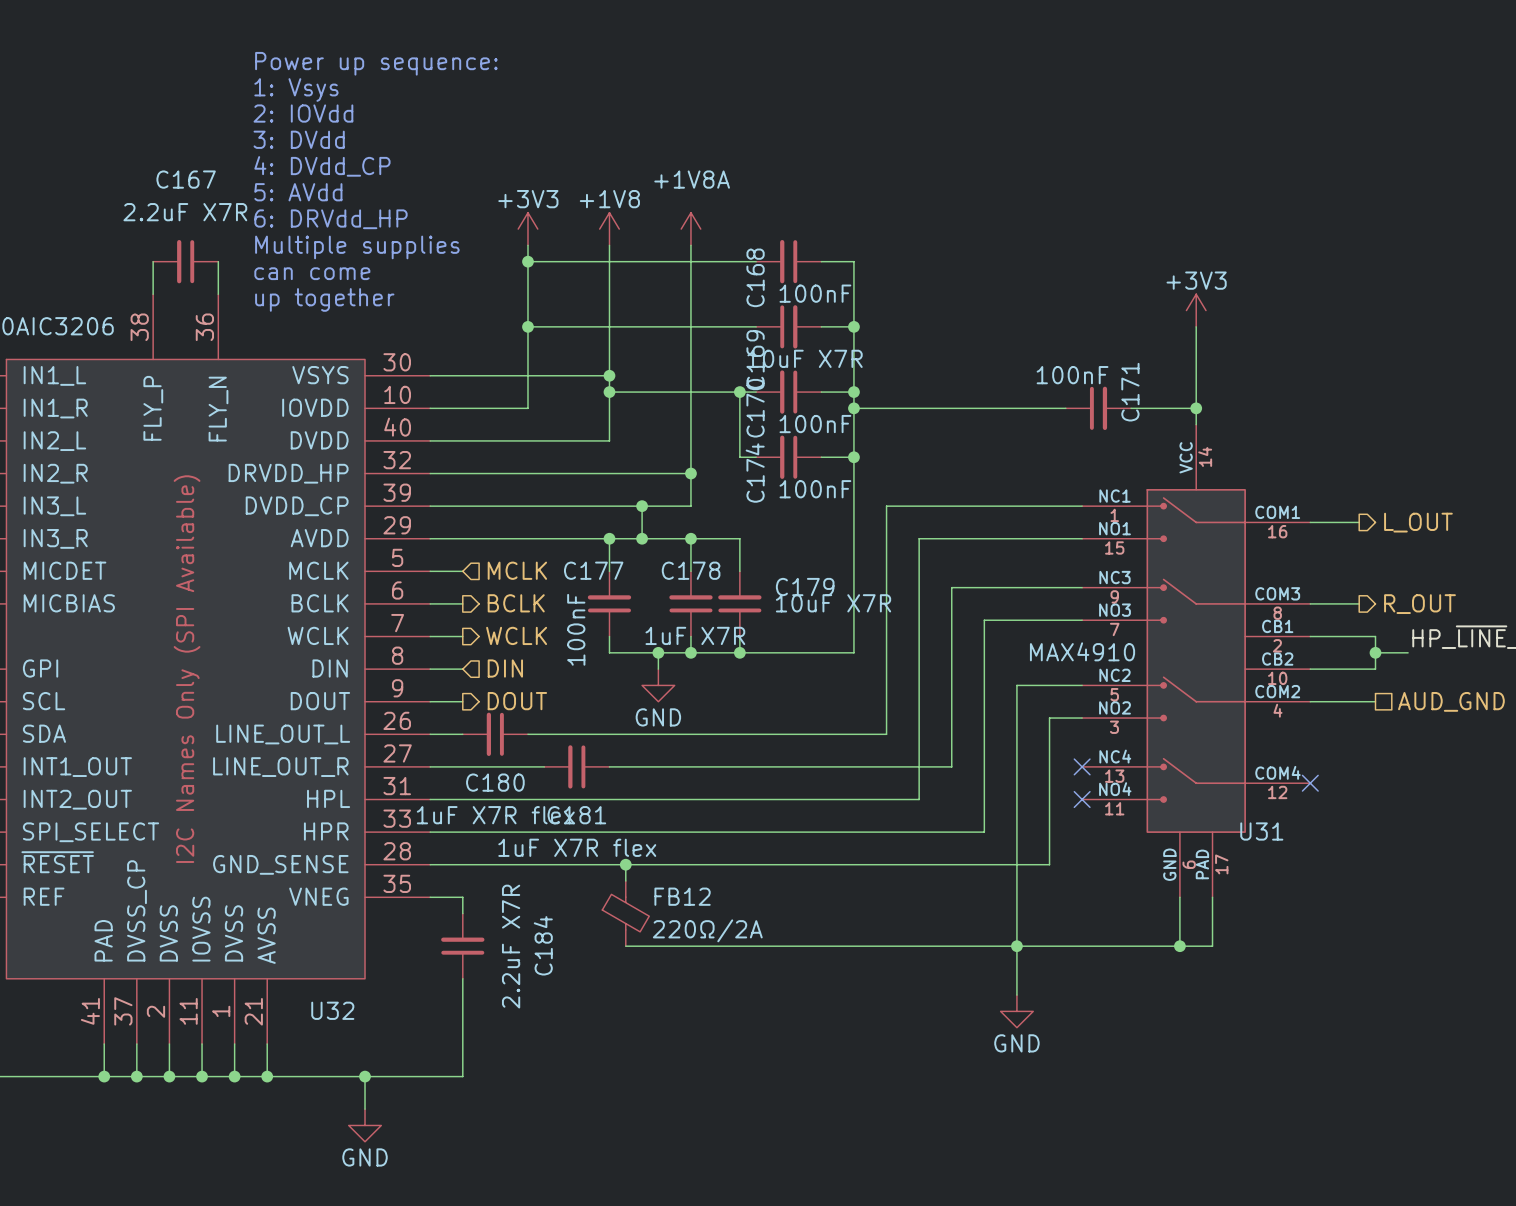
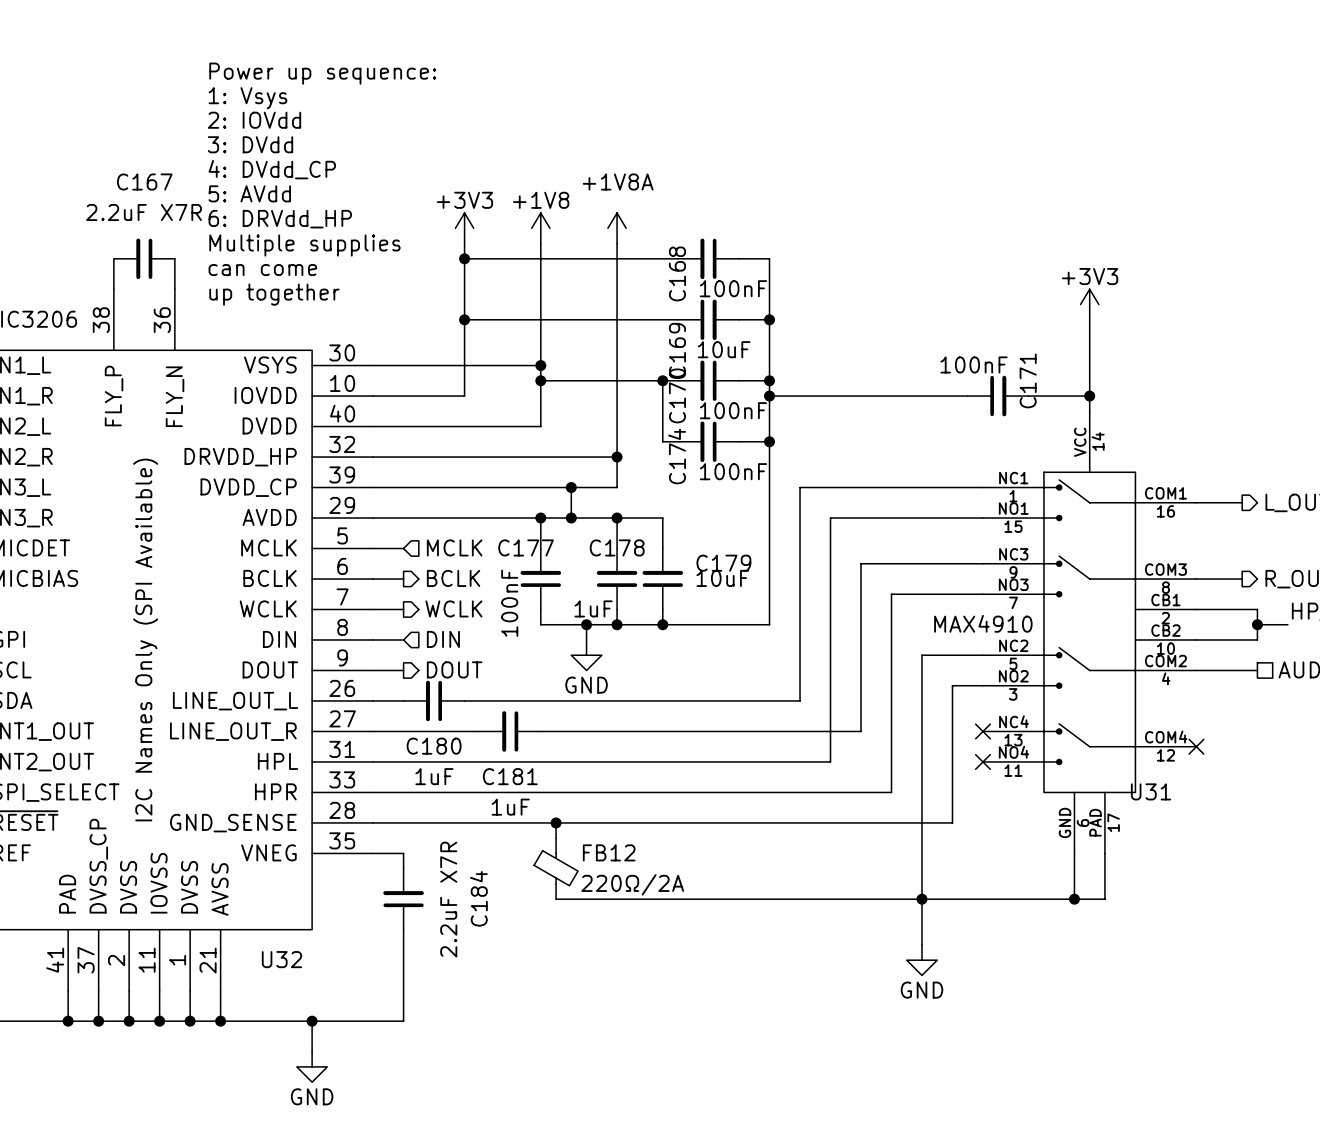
C169 value: 10uF X7R (805, 358) -> 10uF (724, 349)
C179 value: 10uF X7R (833, 603) -> 10uF (722, 578)
C178 value: 1uF X7R (695, 635) -> 1uF (593, 608)
C180 value: 1uF X7R flex (495, 815) -> 1uF (434, 776)
C181 value: 1uF X7R flex (577, 847) -> 1uF (510, 807)

